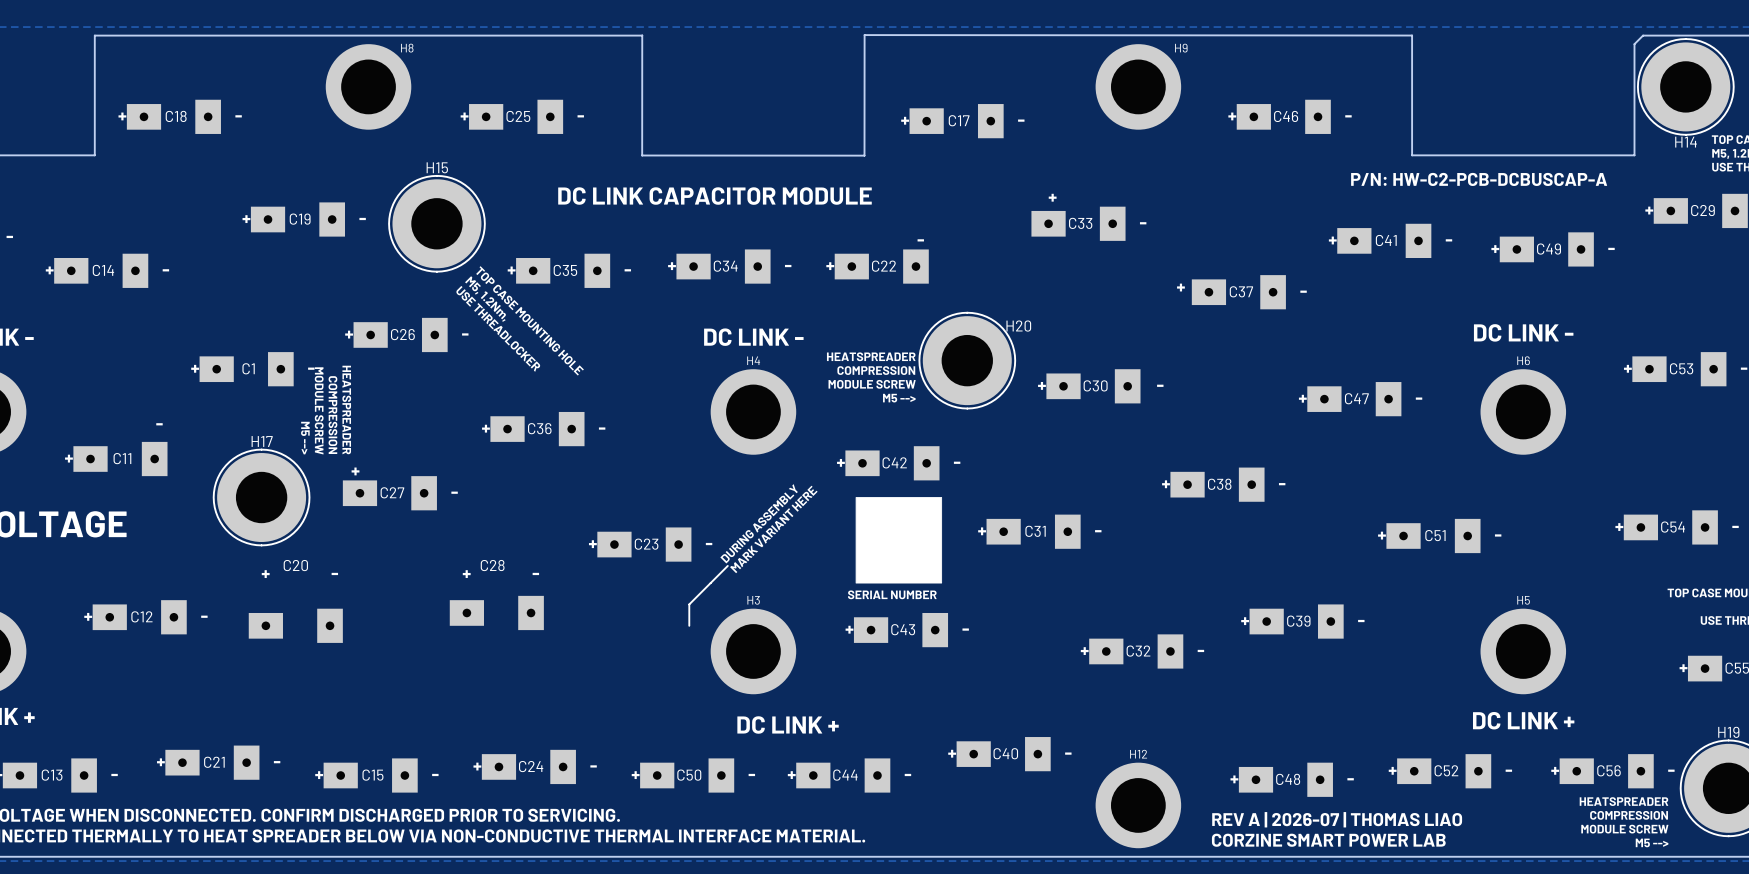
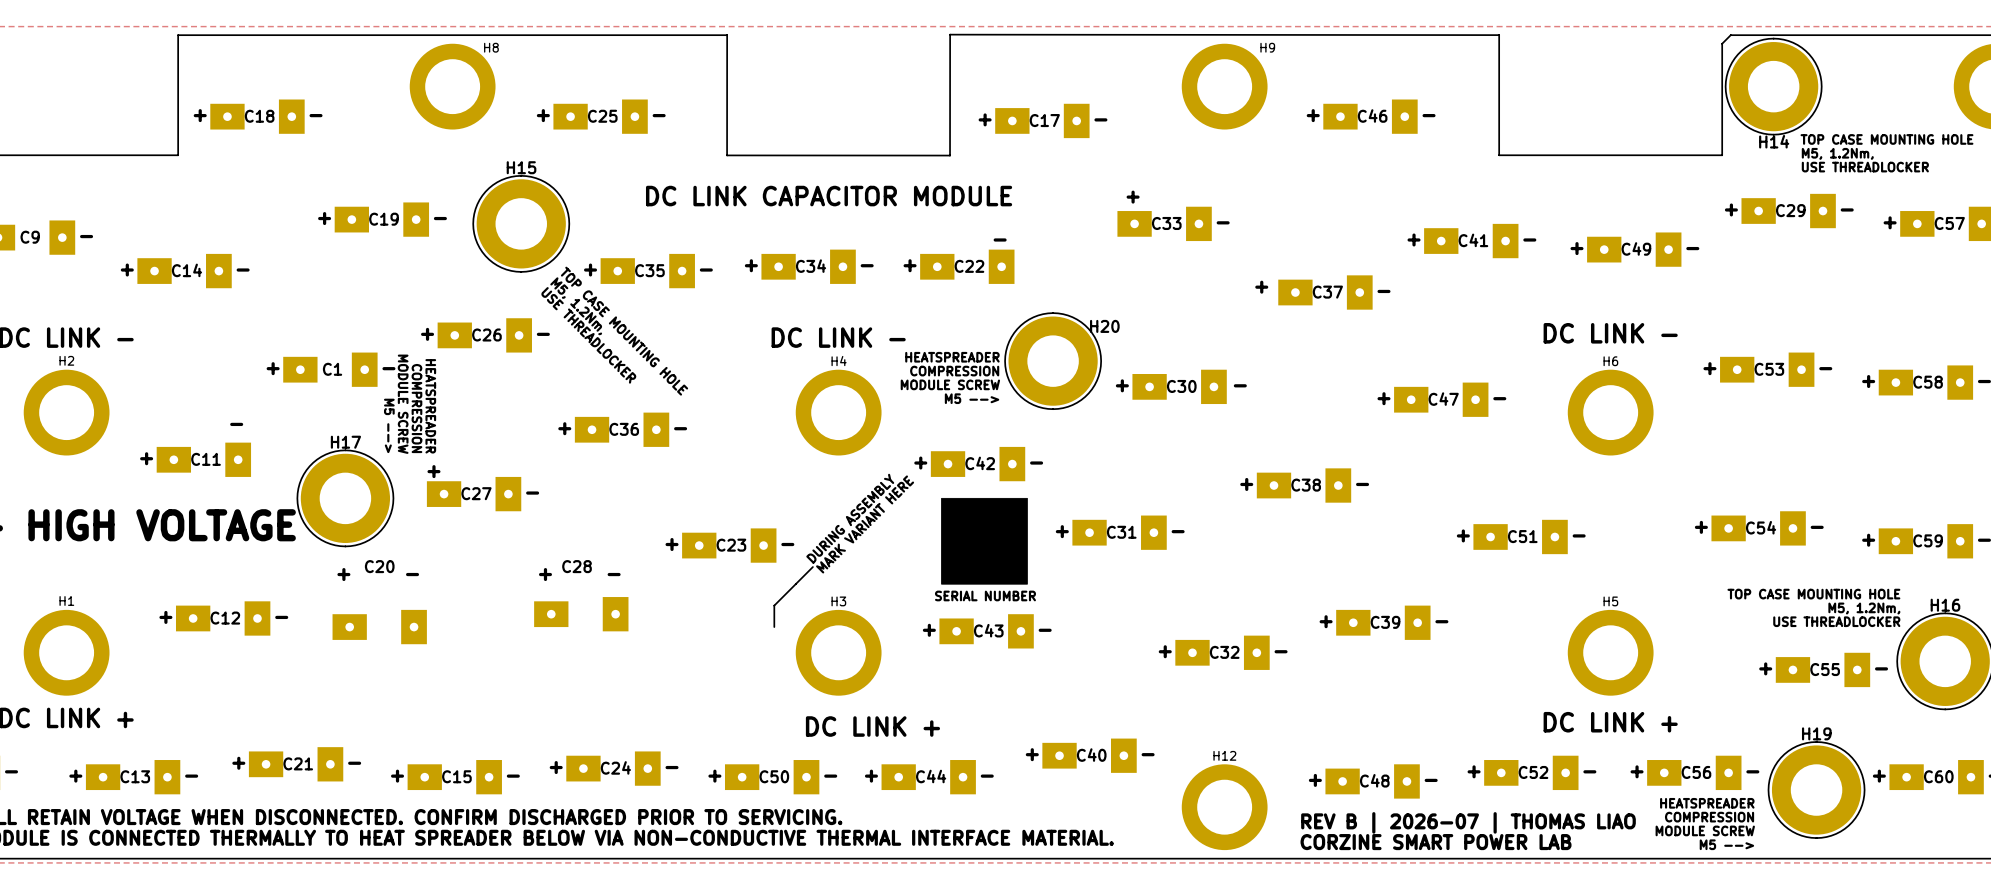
text: P/N: HW-C2-PCB-DCBUSCAP-A (1479, 179) -> none
text: REV A | 2026-07 | THOMAS LIAO (1337, 819) -> REV B | 2026-07 | THOMAS LIAO (1468, 822)

